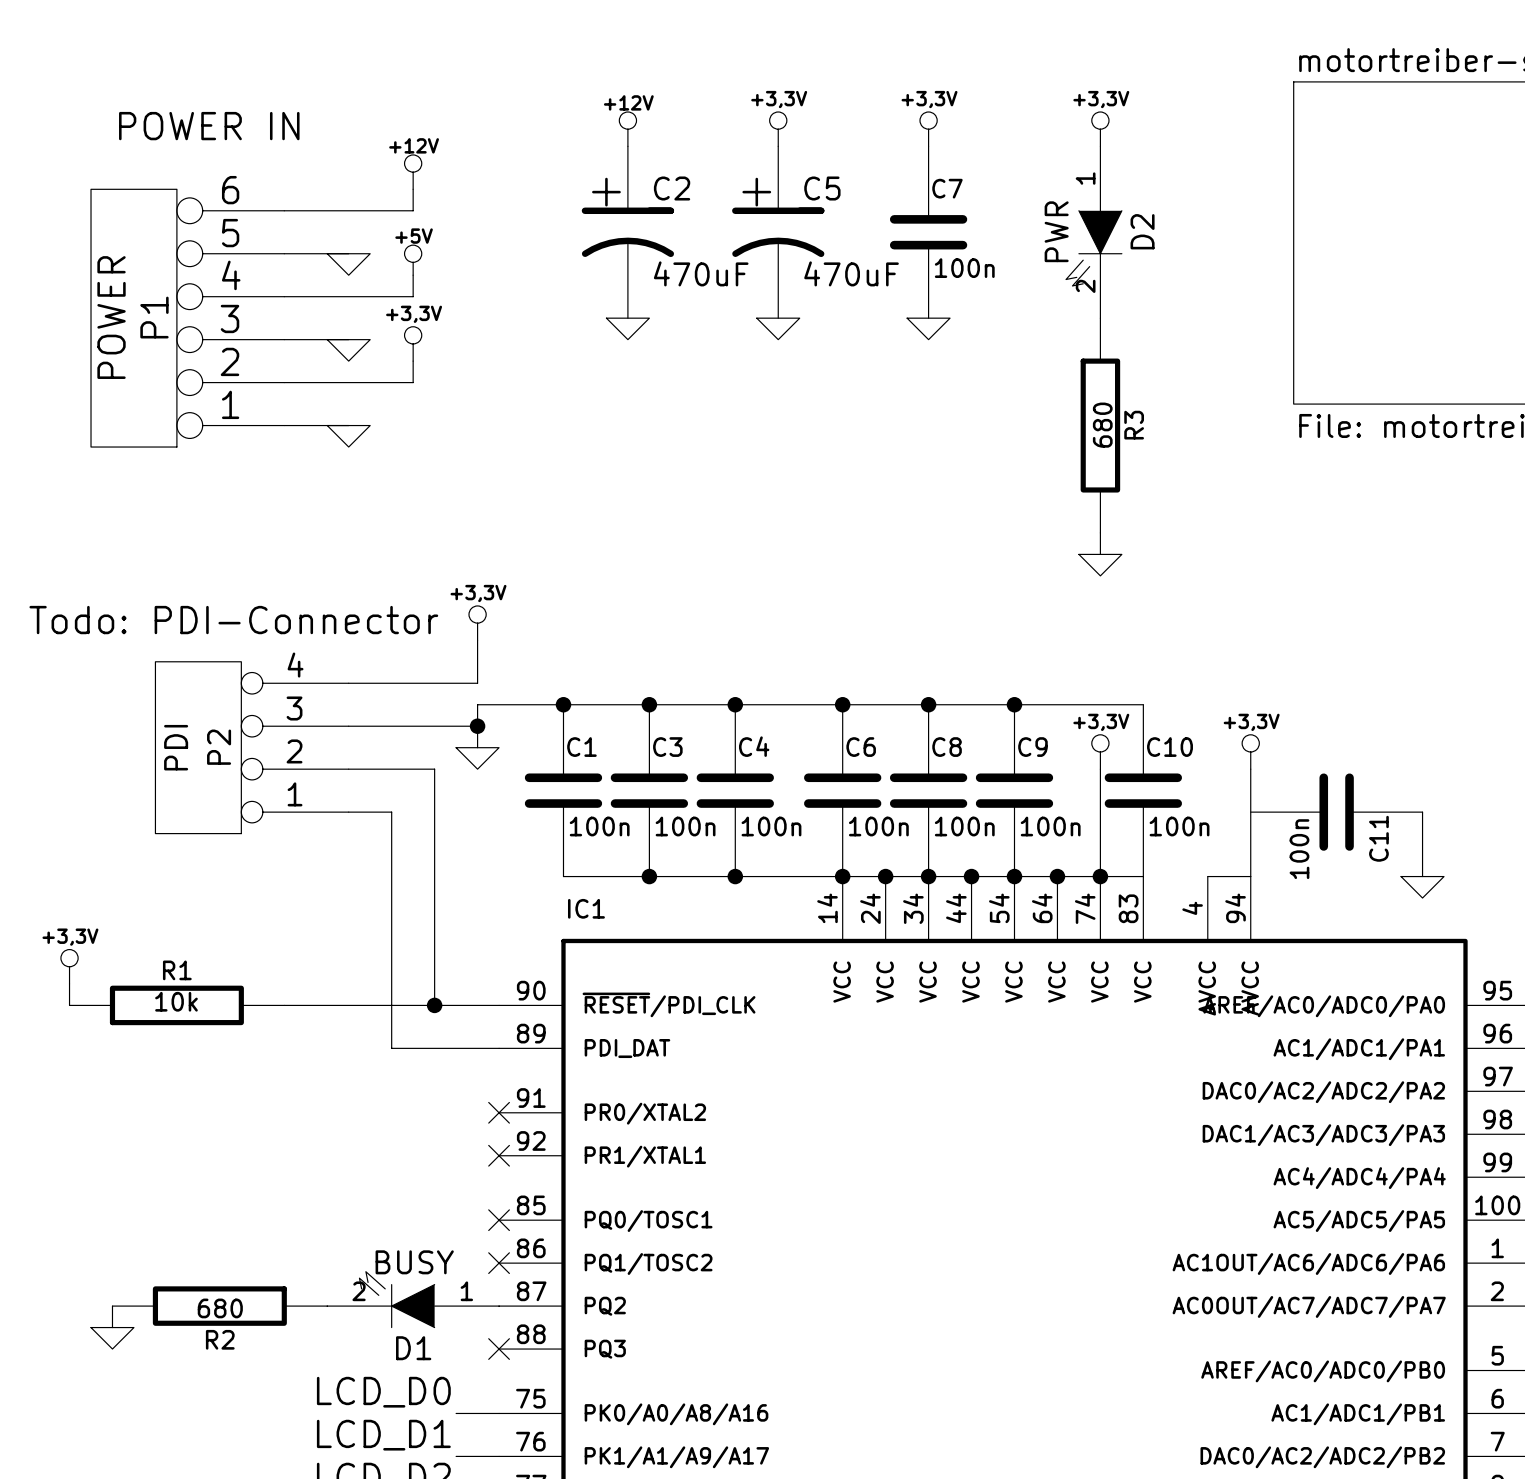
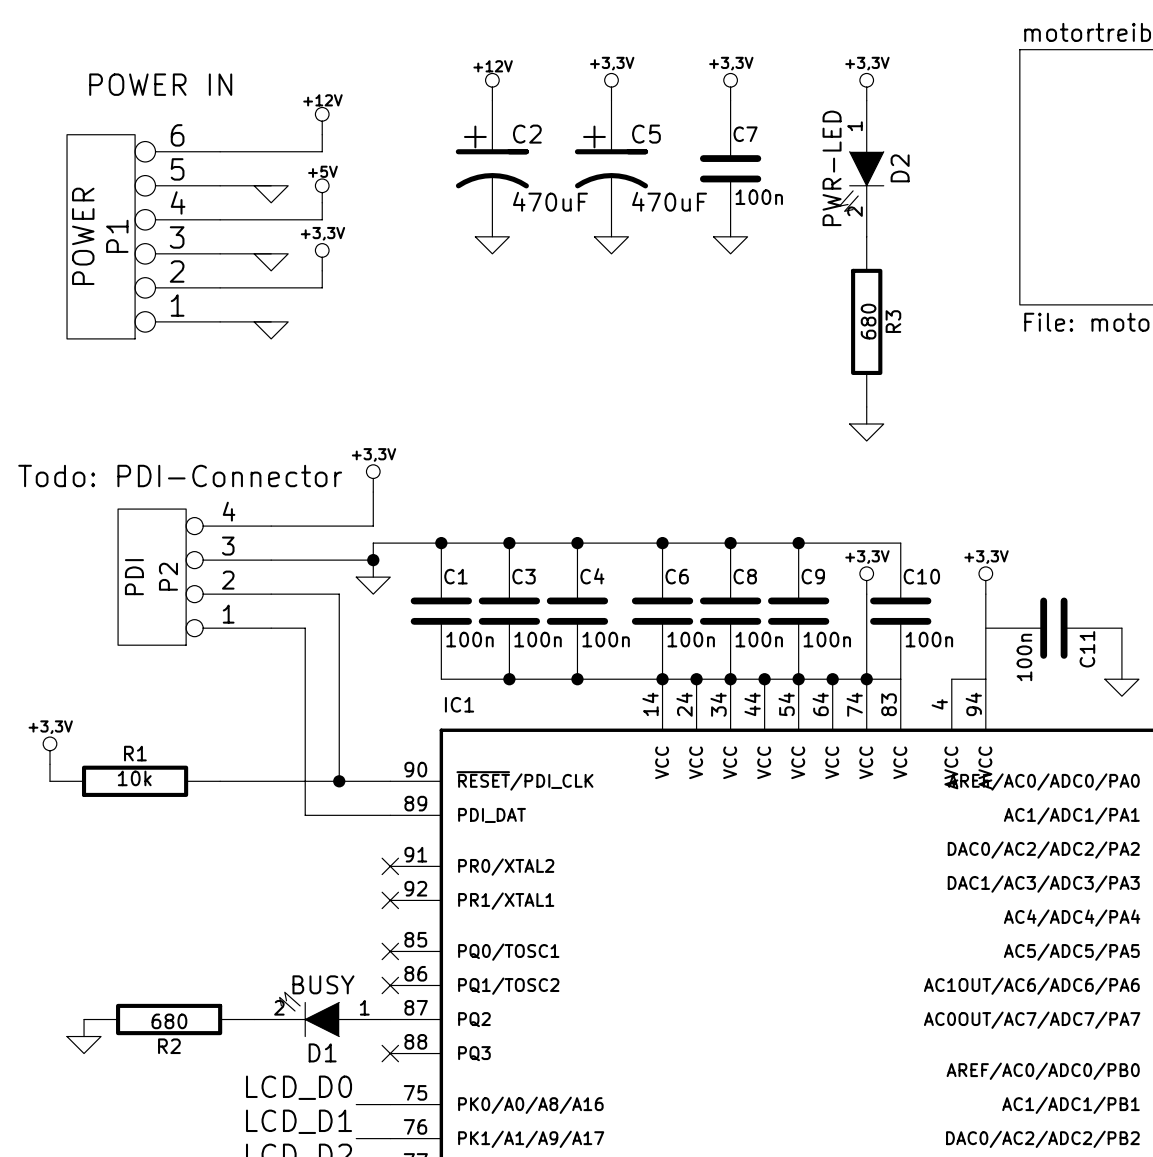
D2 value: PWR (1056, 231) -> PWR-LED (832, 168)

